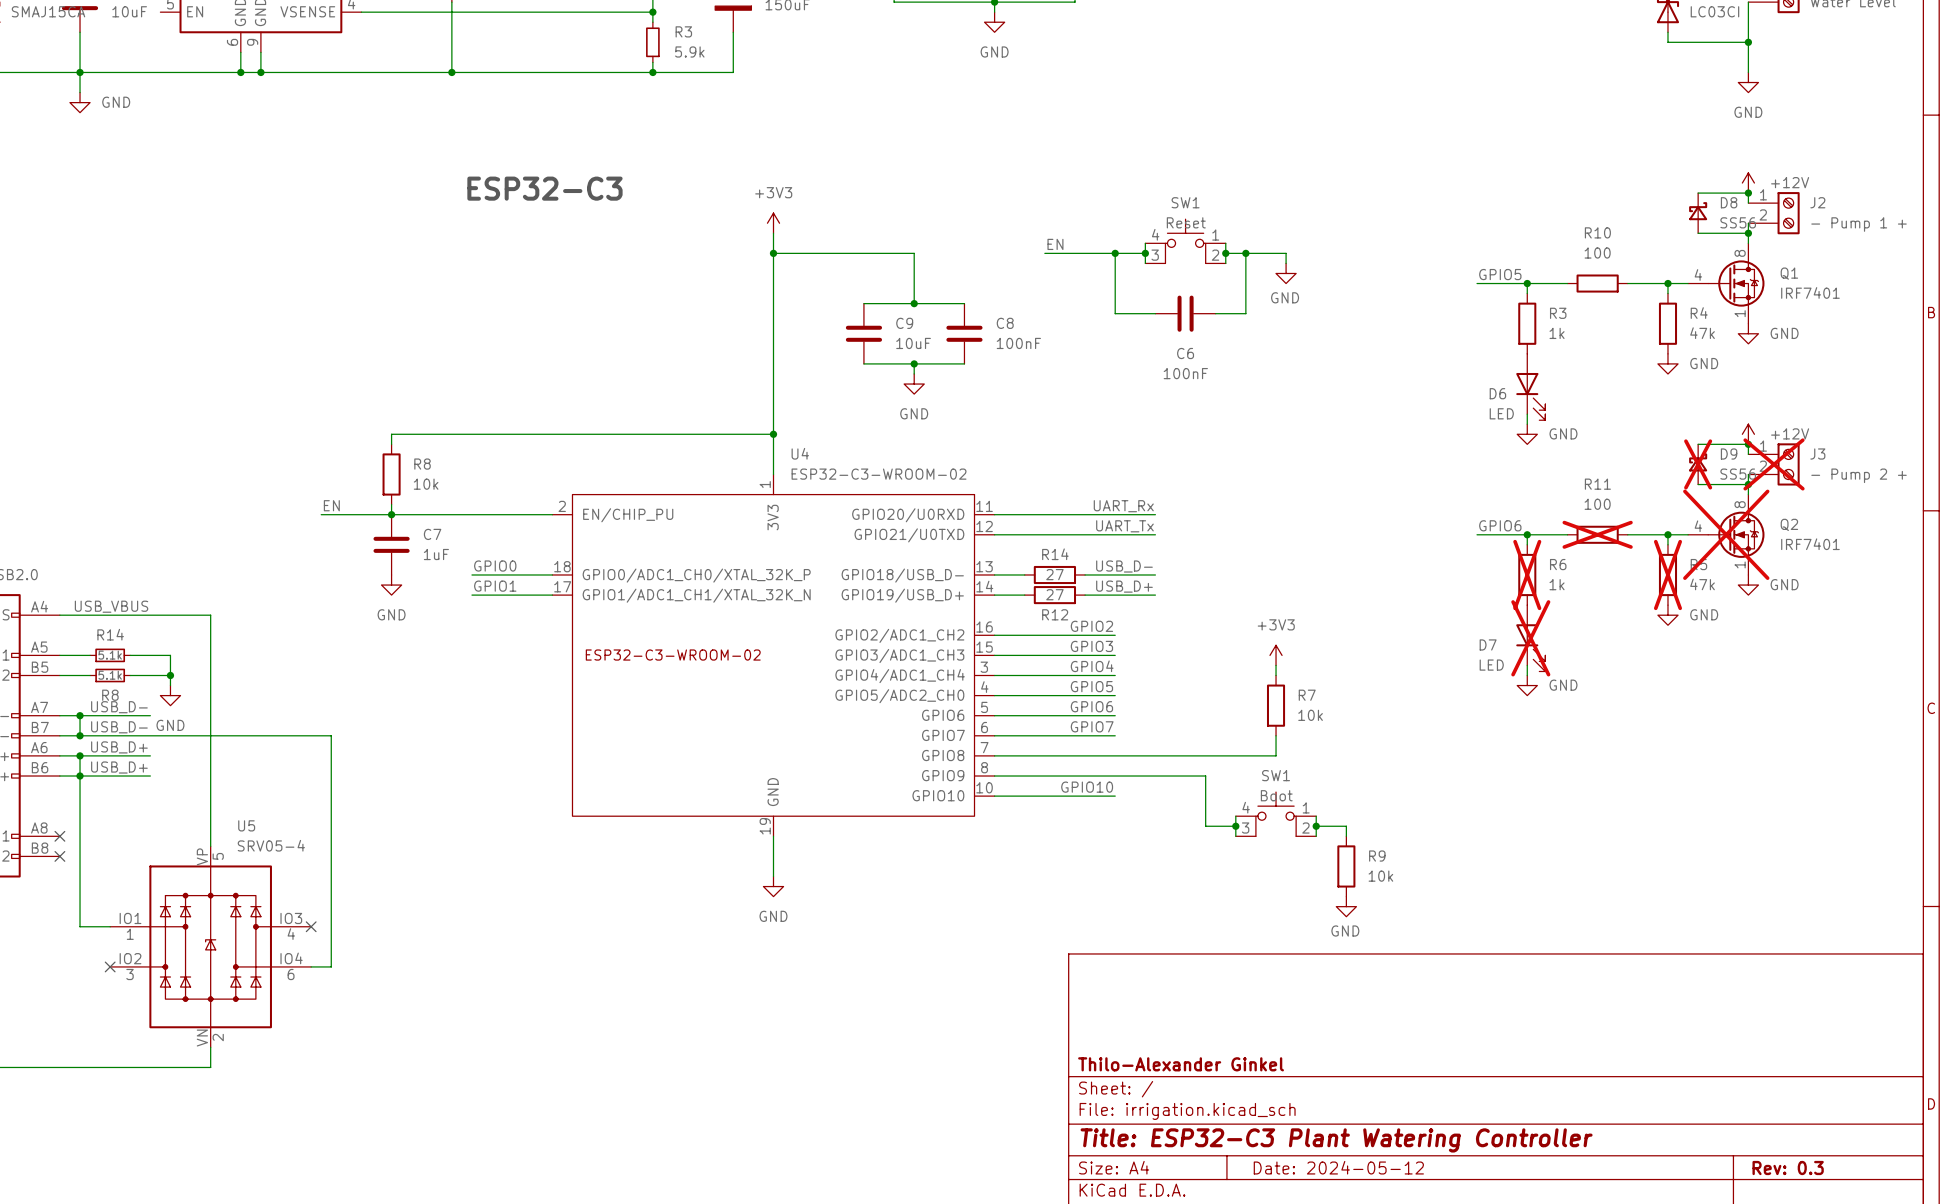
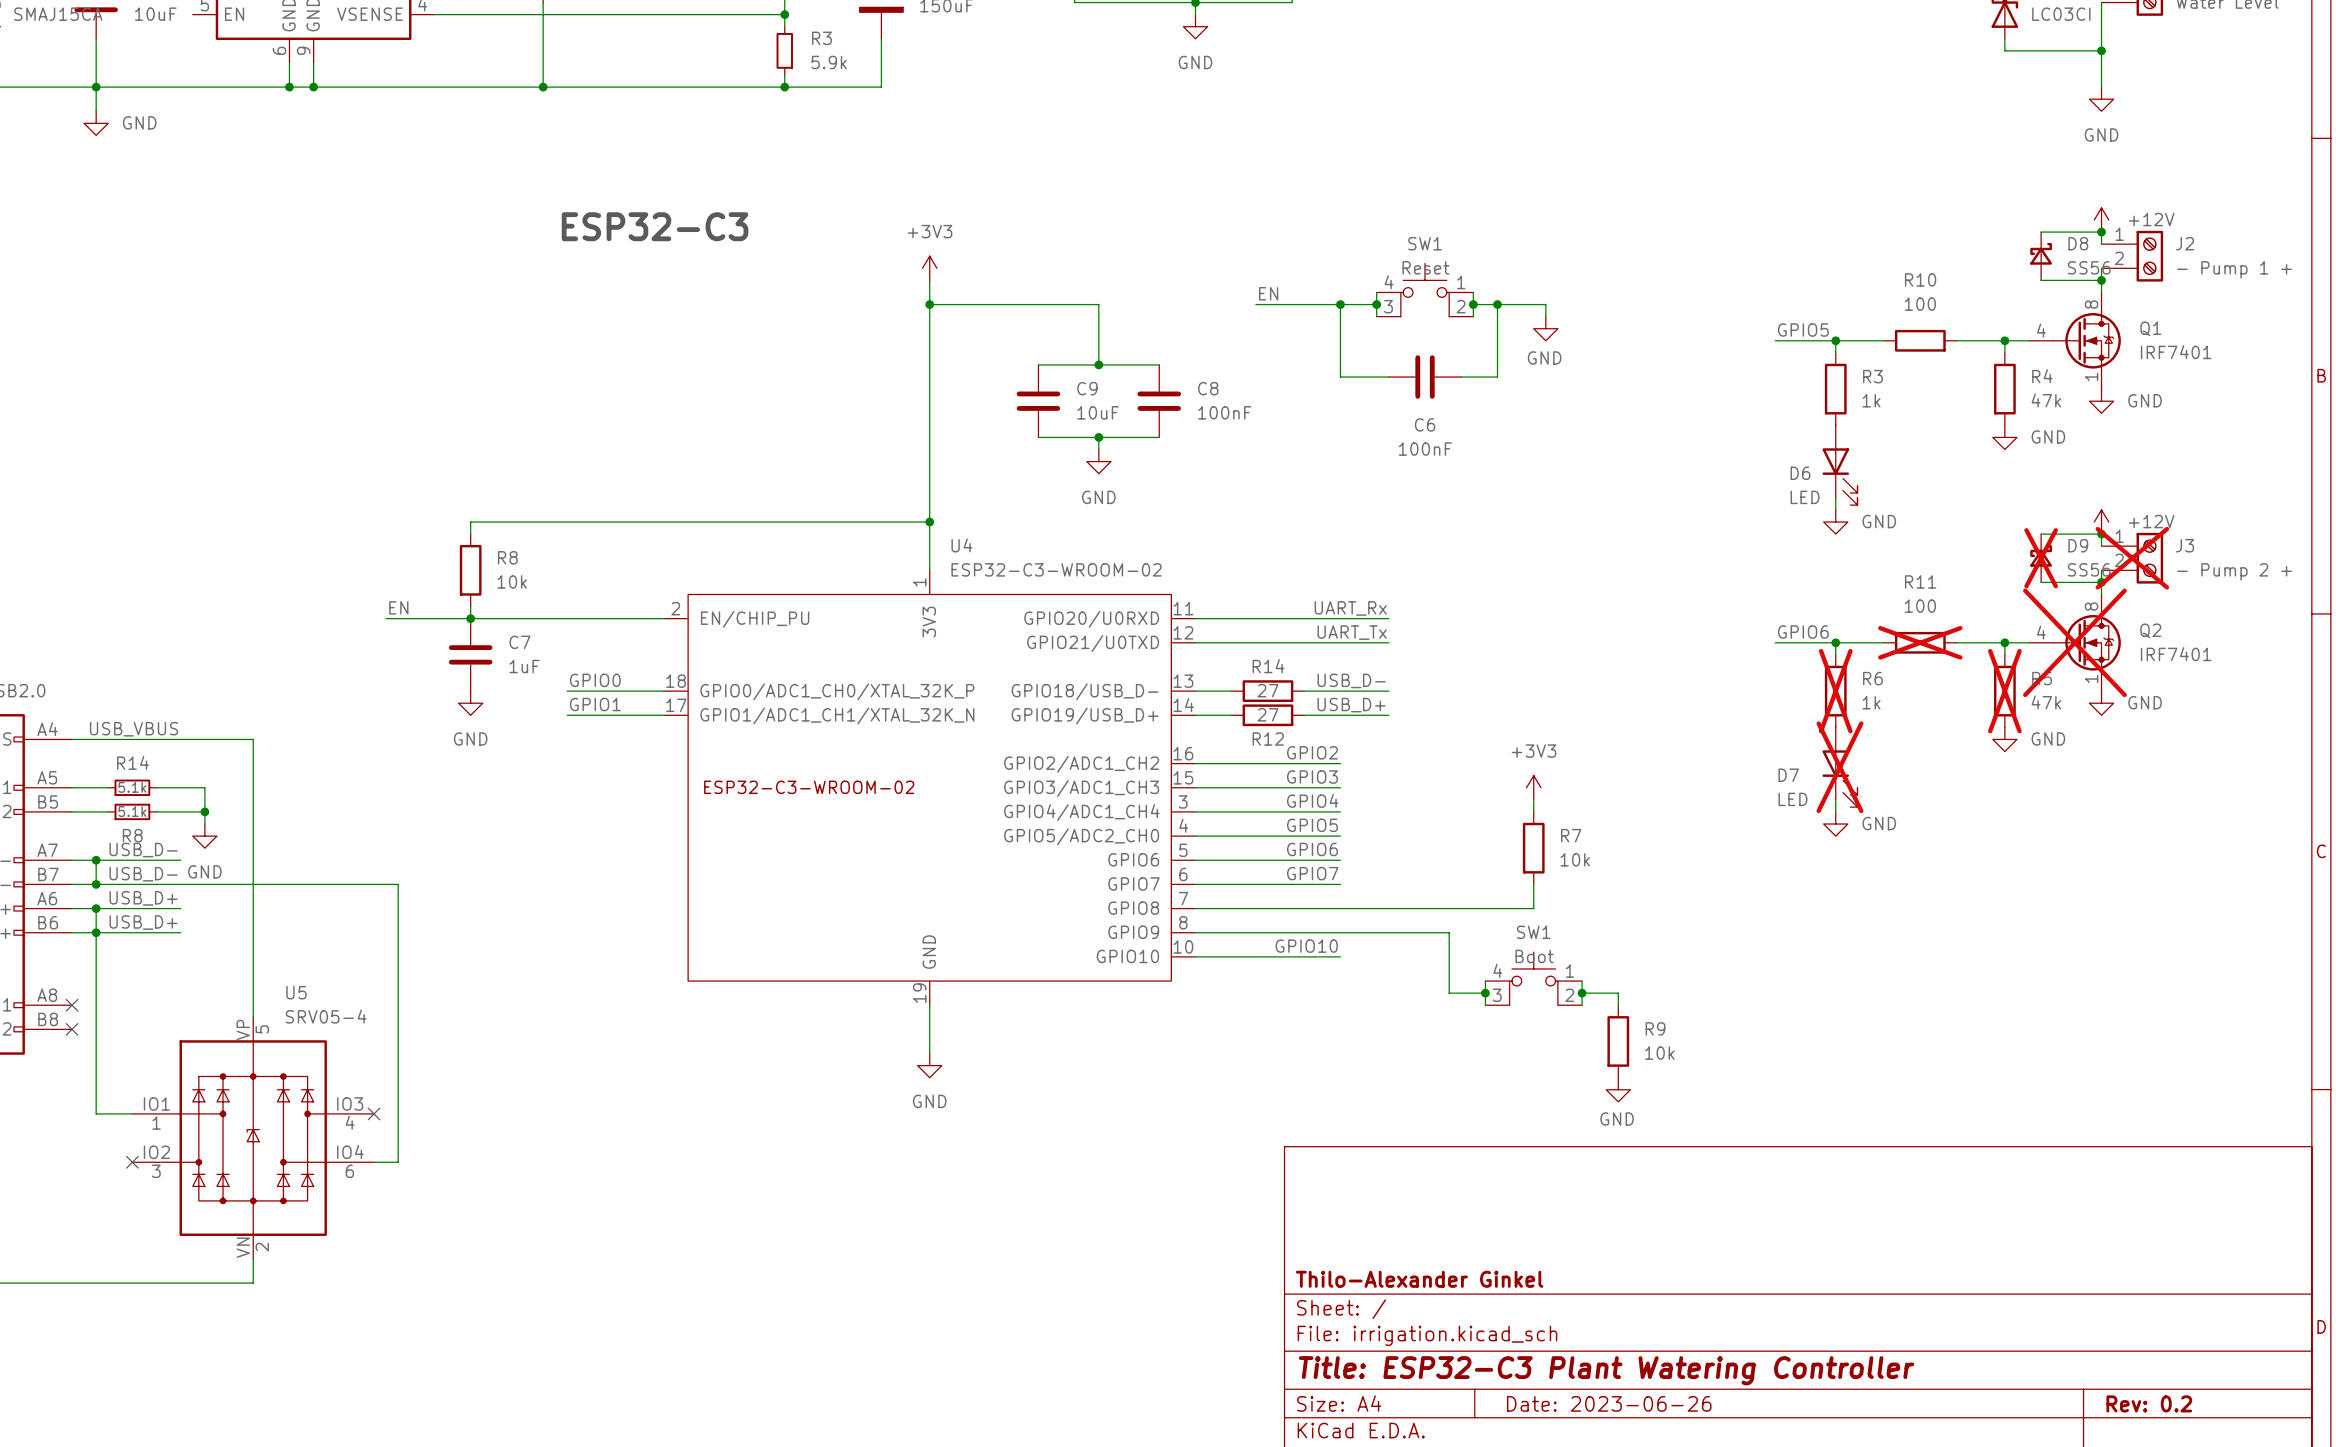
title block: Date: 2024-05-12 (1338, 1167) -> Date: 2023-06-26 (1609, 1403)
title block: Rev: 0.3 (1788, 1168) -> Rev: 0.2 (2149, 1403)

